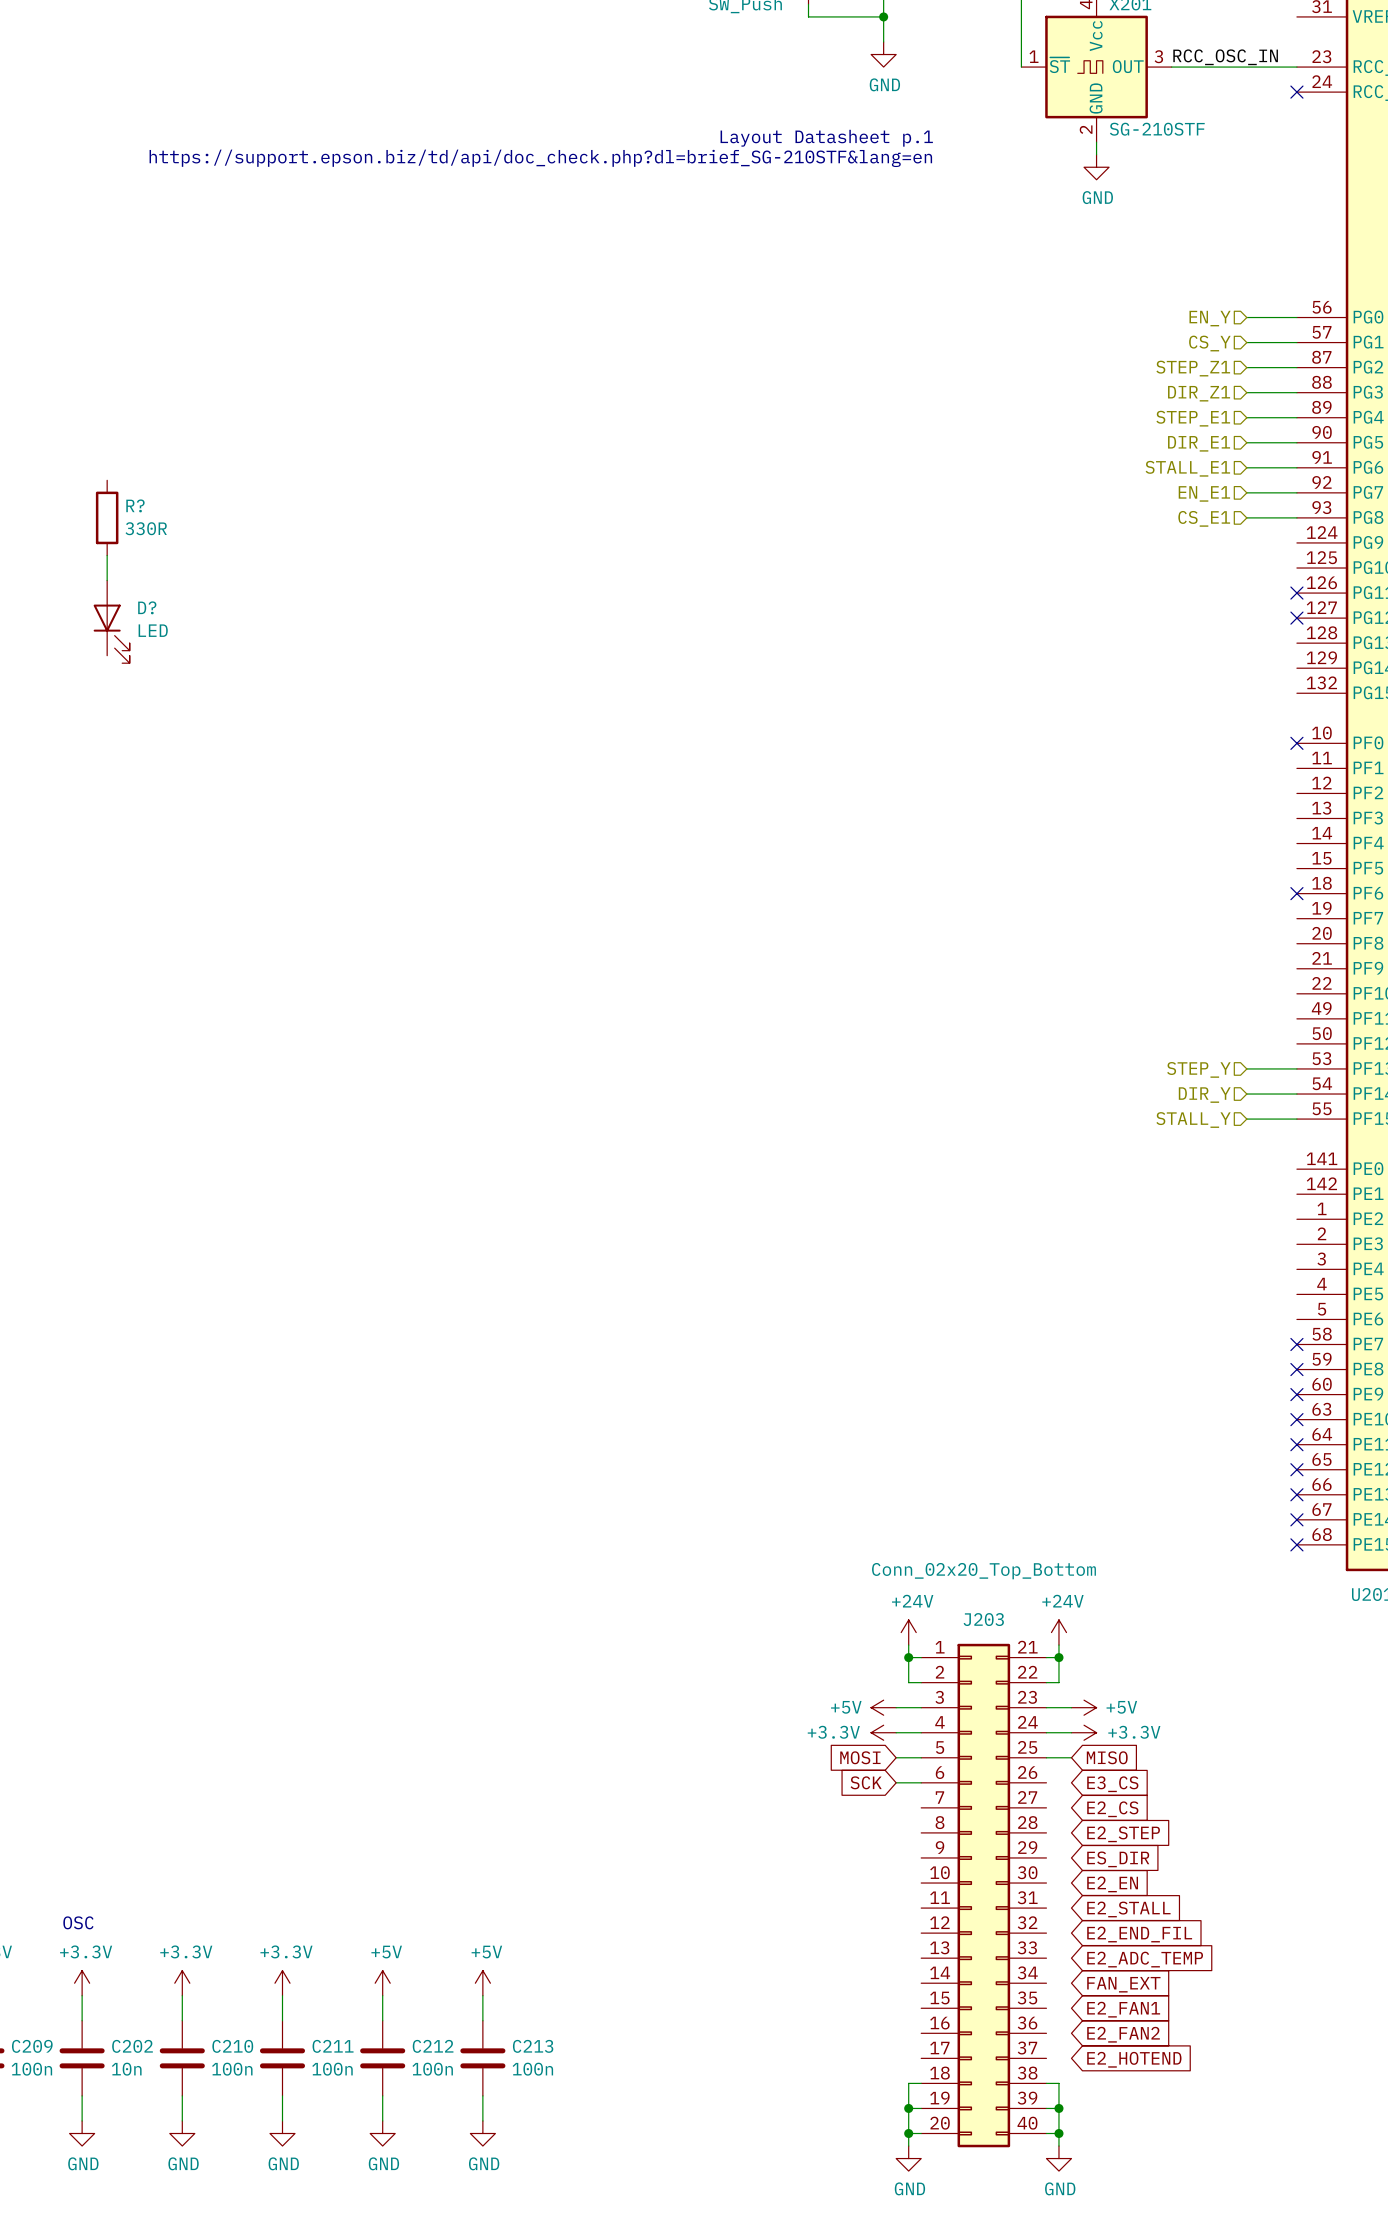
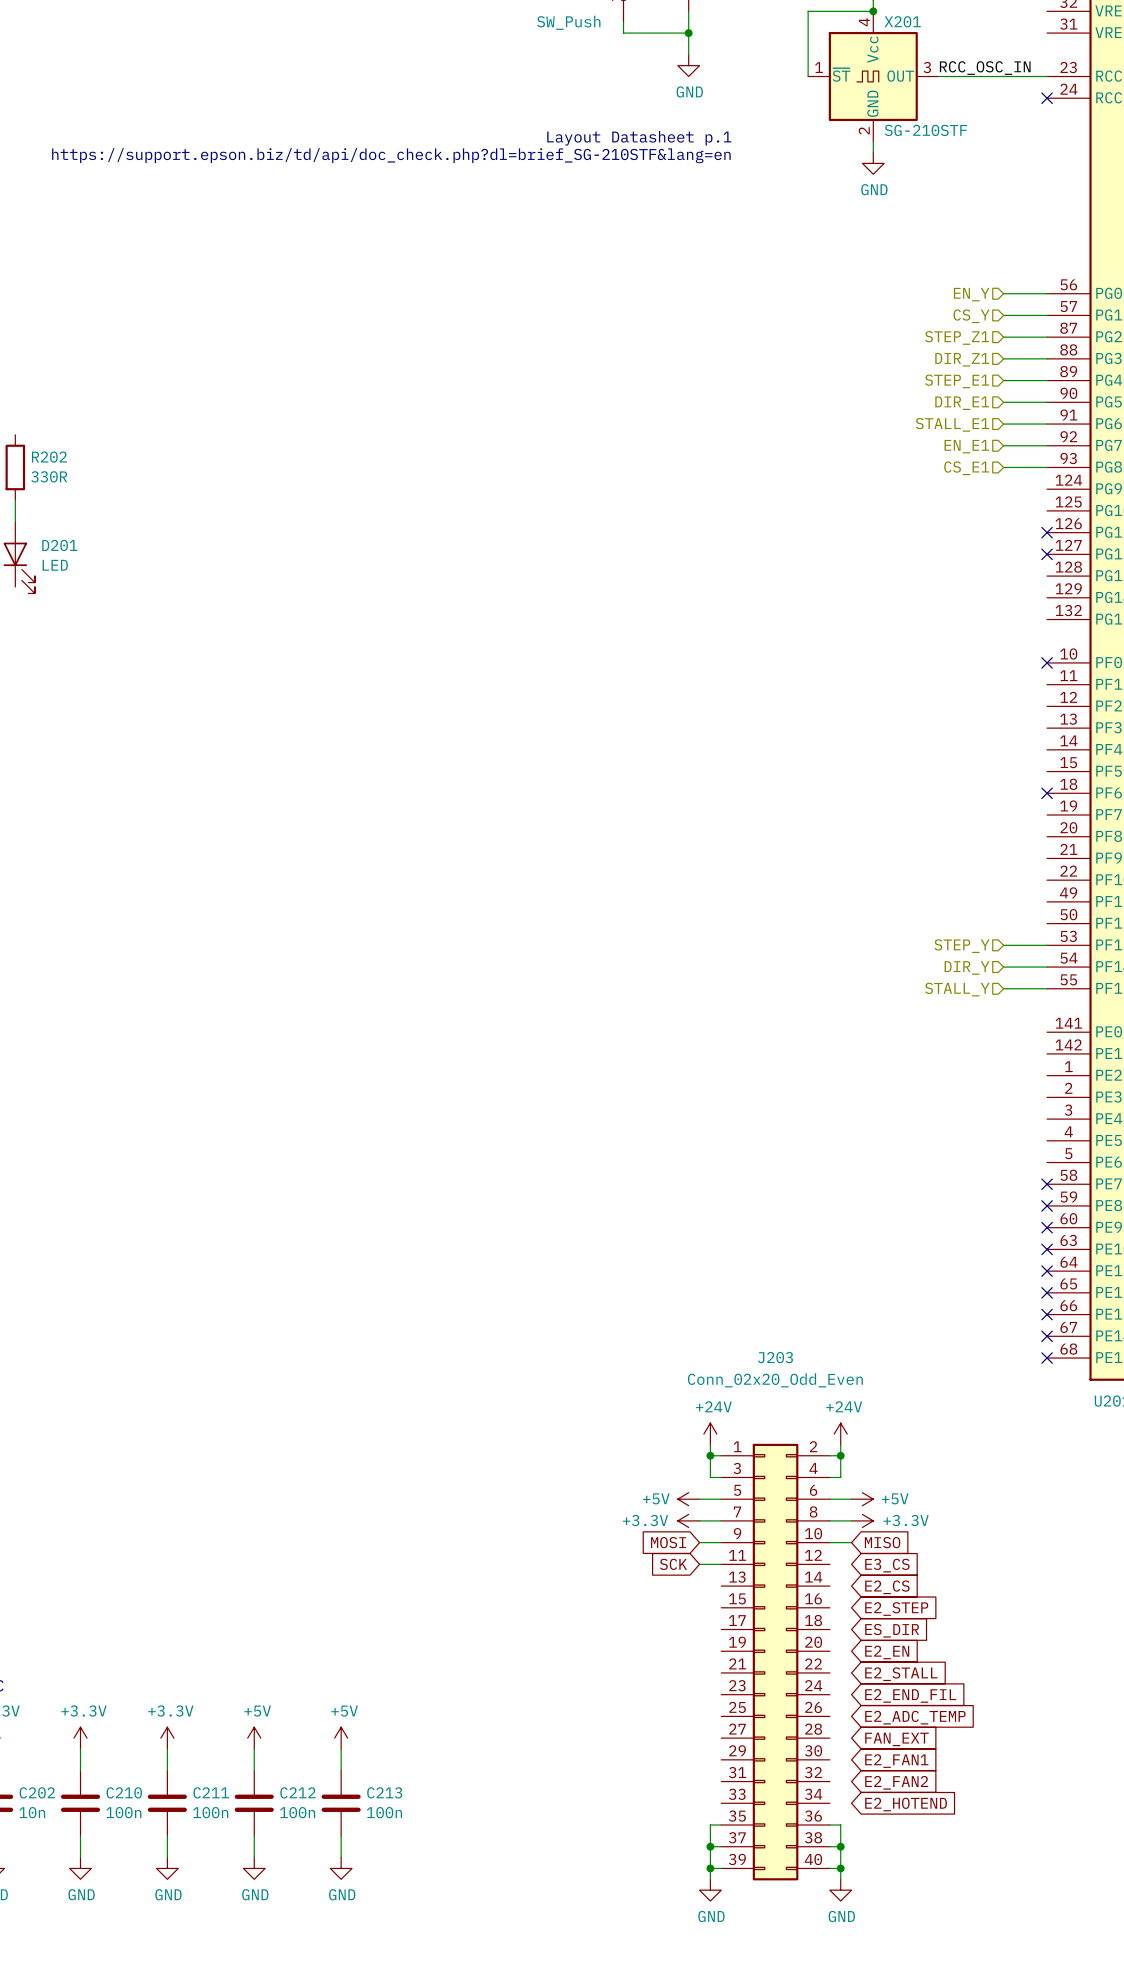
R? name: R? (135, 505) -> R202 (49, 457)
D? name: D? (147, 607) -> D201 (59, 545)
J203 value: Conn_02x20_Top_Bottom (983, 1571) -> Conn_02x20_Odd_Even (775, 1380)
J203 name position: J203 (983, 1619) -> J203 (775, 1357)
J203 symbol: [921, 1643, 1047, 2148] -> [721, 1443, 830, 1881]

